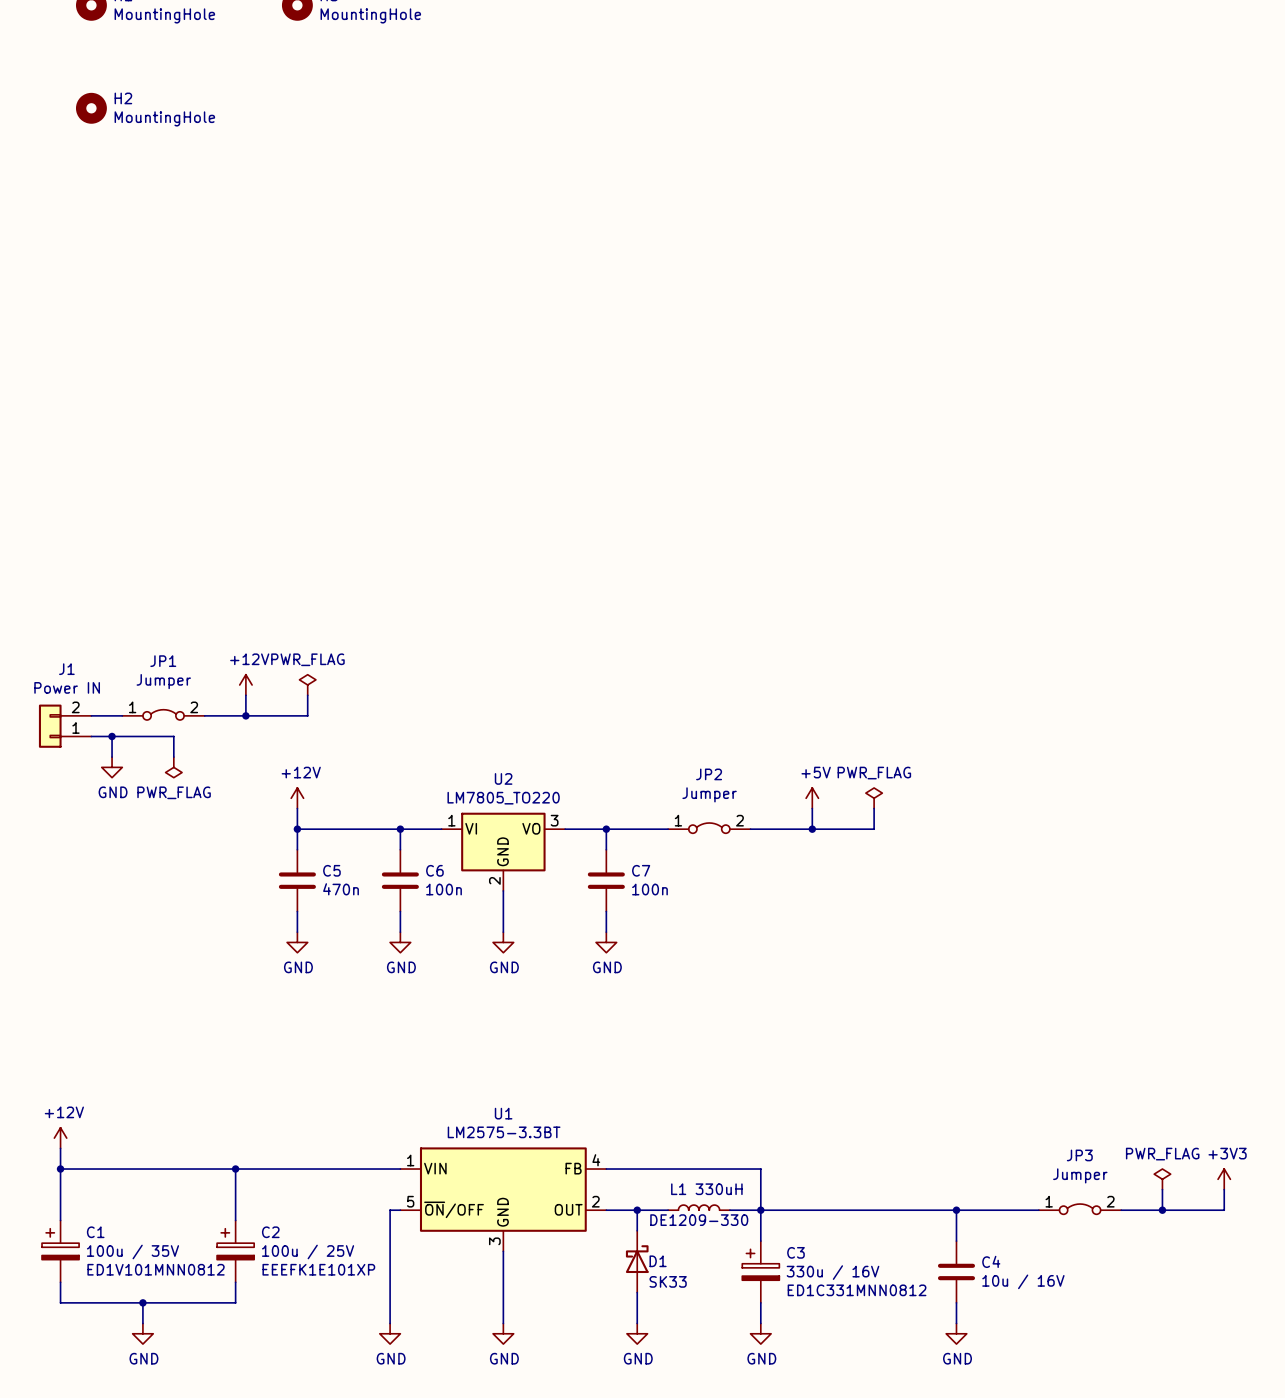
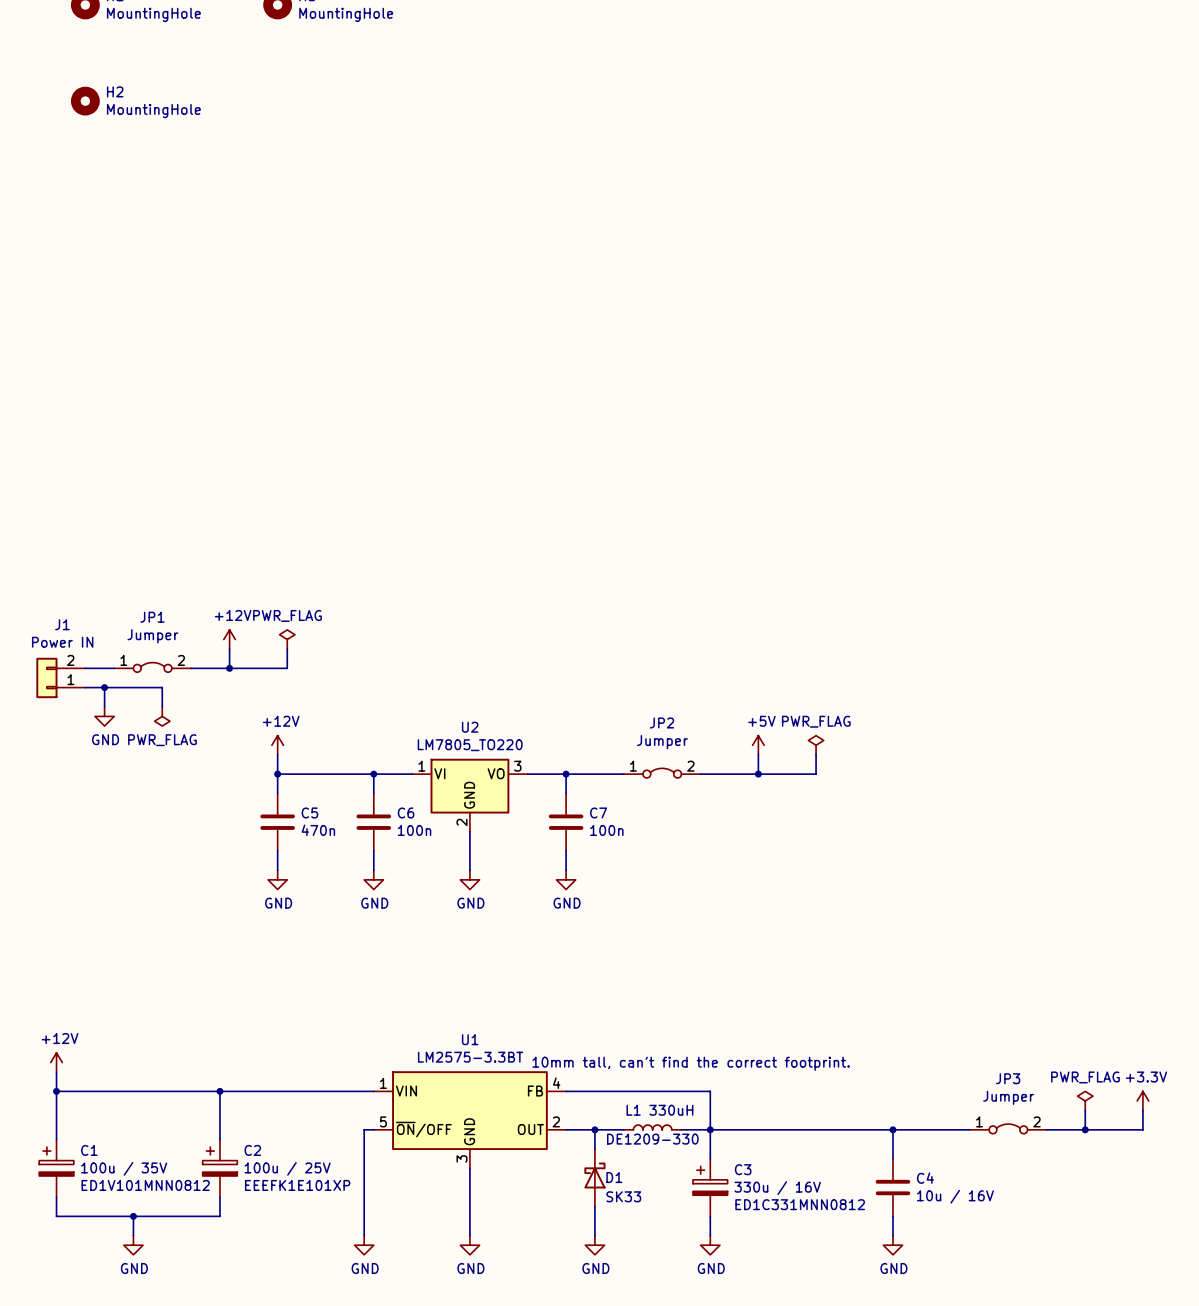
L1 text: none -> 10mm tall, can't find the correct footprint. (691, 1063)
power symbol: +3V3 (1224, 1179) -> +3.3V (1142, 1101)

